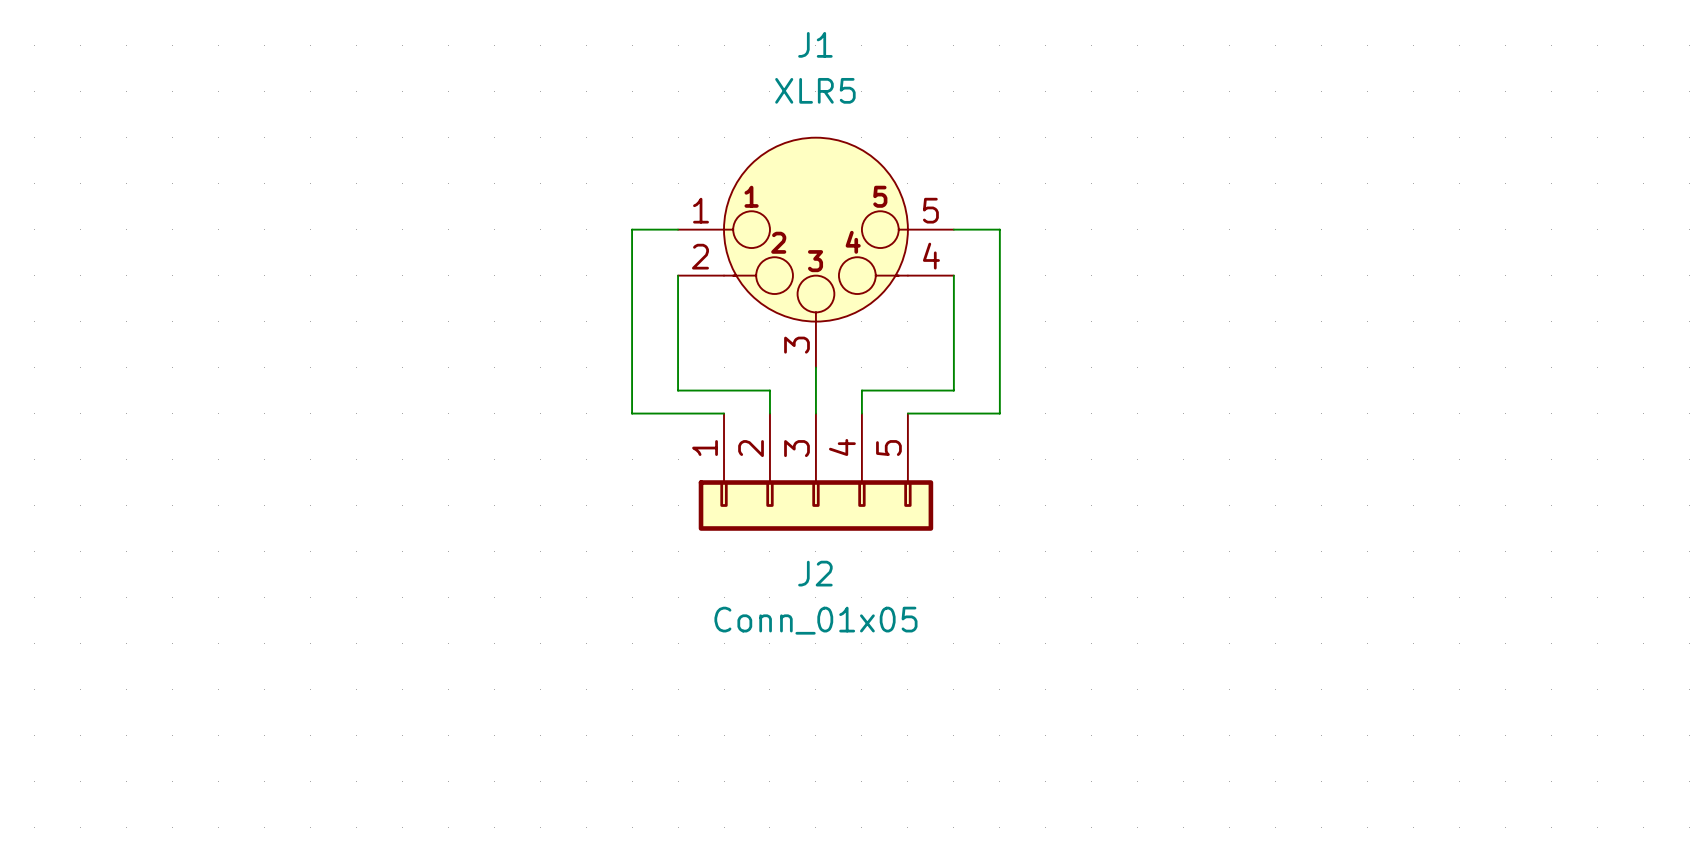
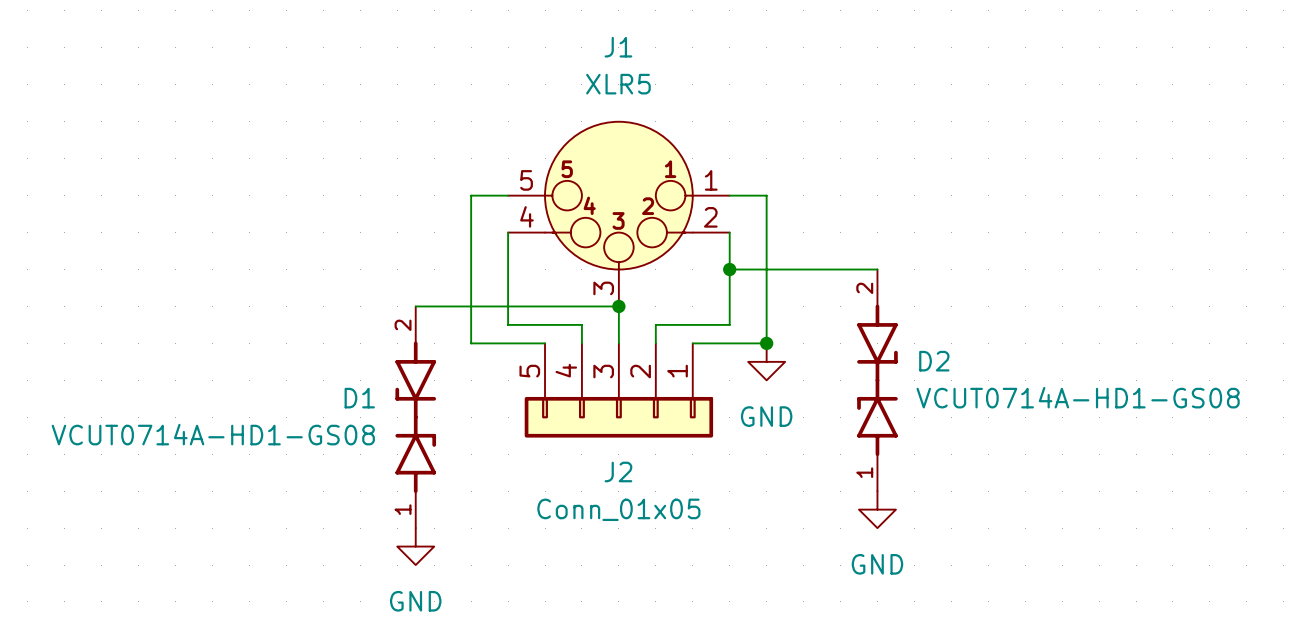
J1 flip: as is (815, 229) -> left-right (618, 195)
wire: none -> (729, 269) (877, 269)
junction: none -> (729, 269)
wire: none -> (415, 306) (618, 306)
junction: none -> (618, 306)
junction: none -> (766, 343)
power symbol: none -> GND (766, 361)
D2: none -> VCUT0714A-HD1-GS08 (877, 380)
D1: none -> VCUT0714A-HD1-GS08 (415, 417)
J2 flip: as is (815, 505) -> left-right (618, 417)
power symbol: none -> GND (877, 509)
power symbol: none -> GND (415, 546)

